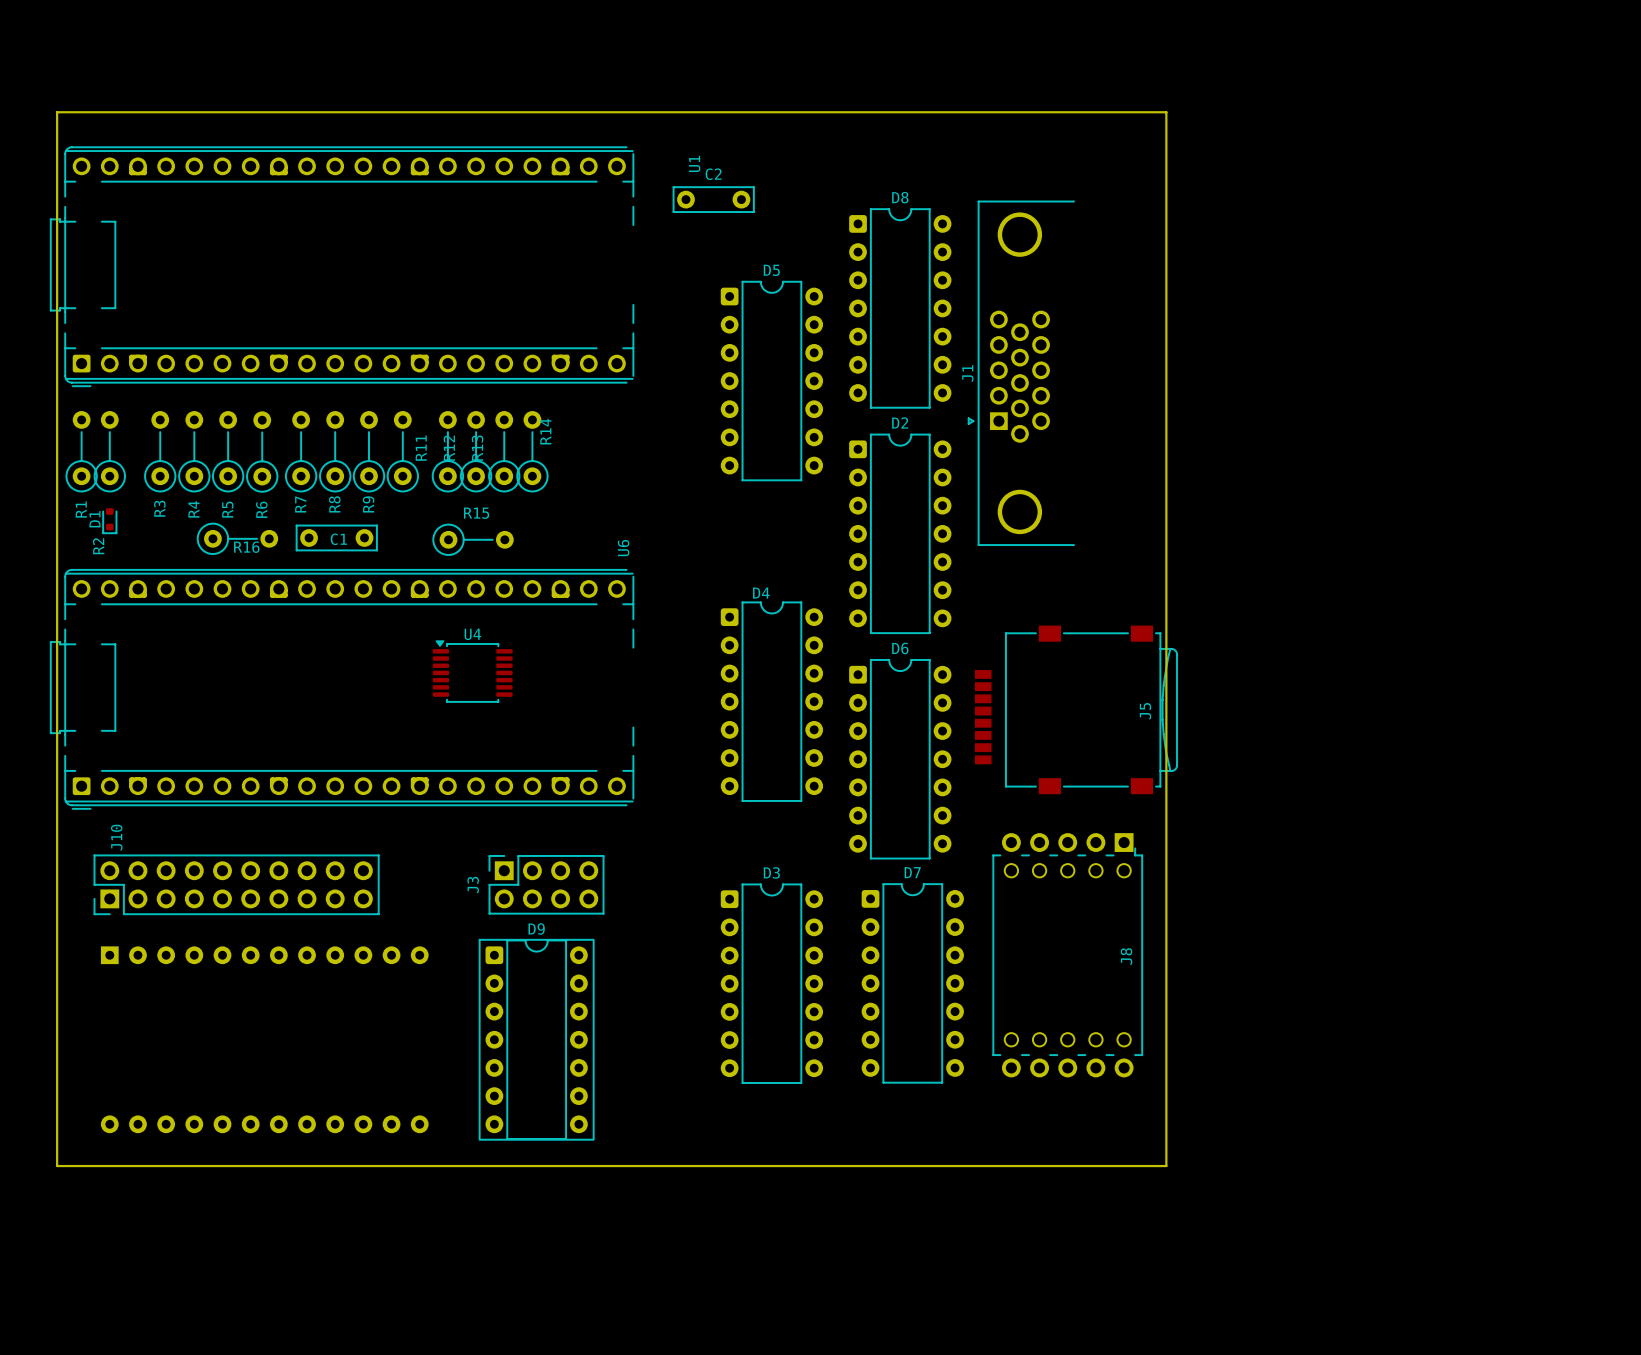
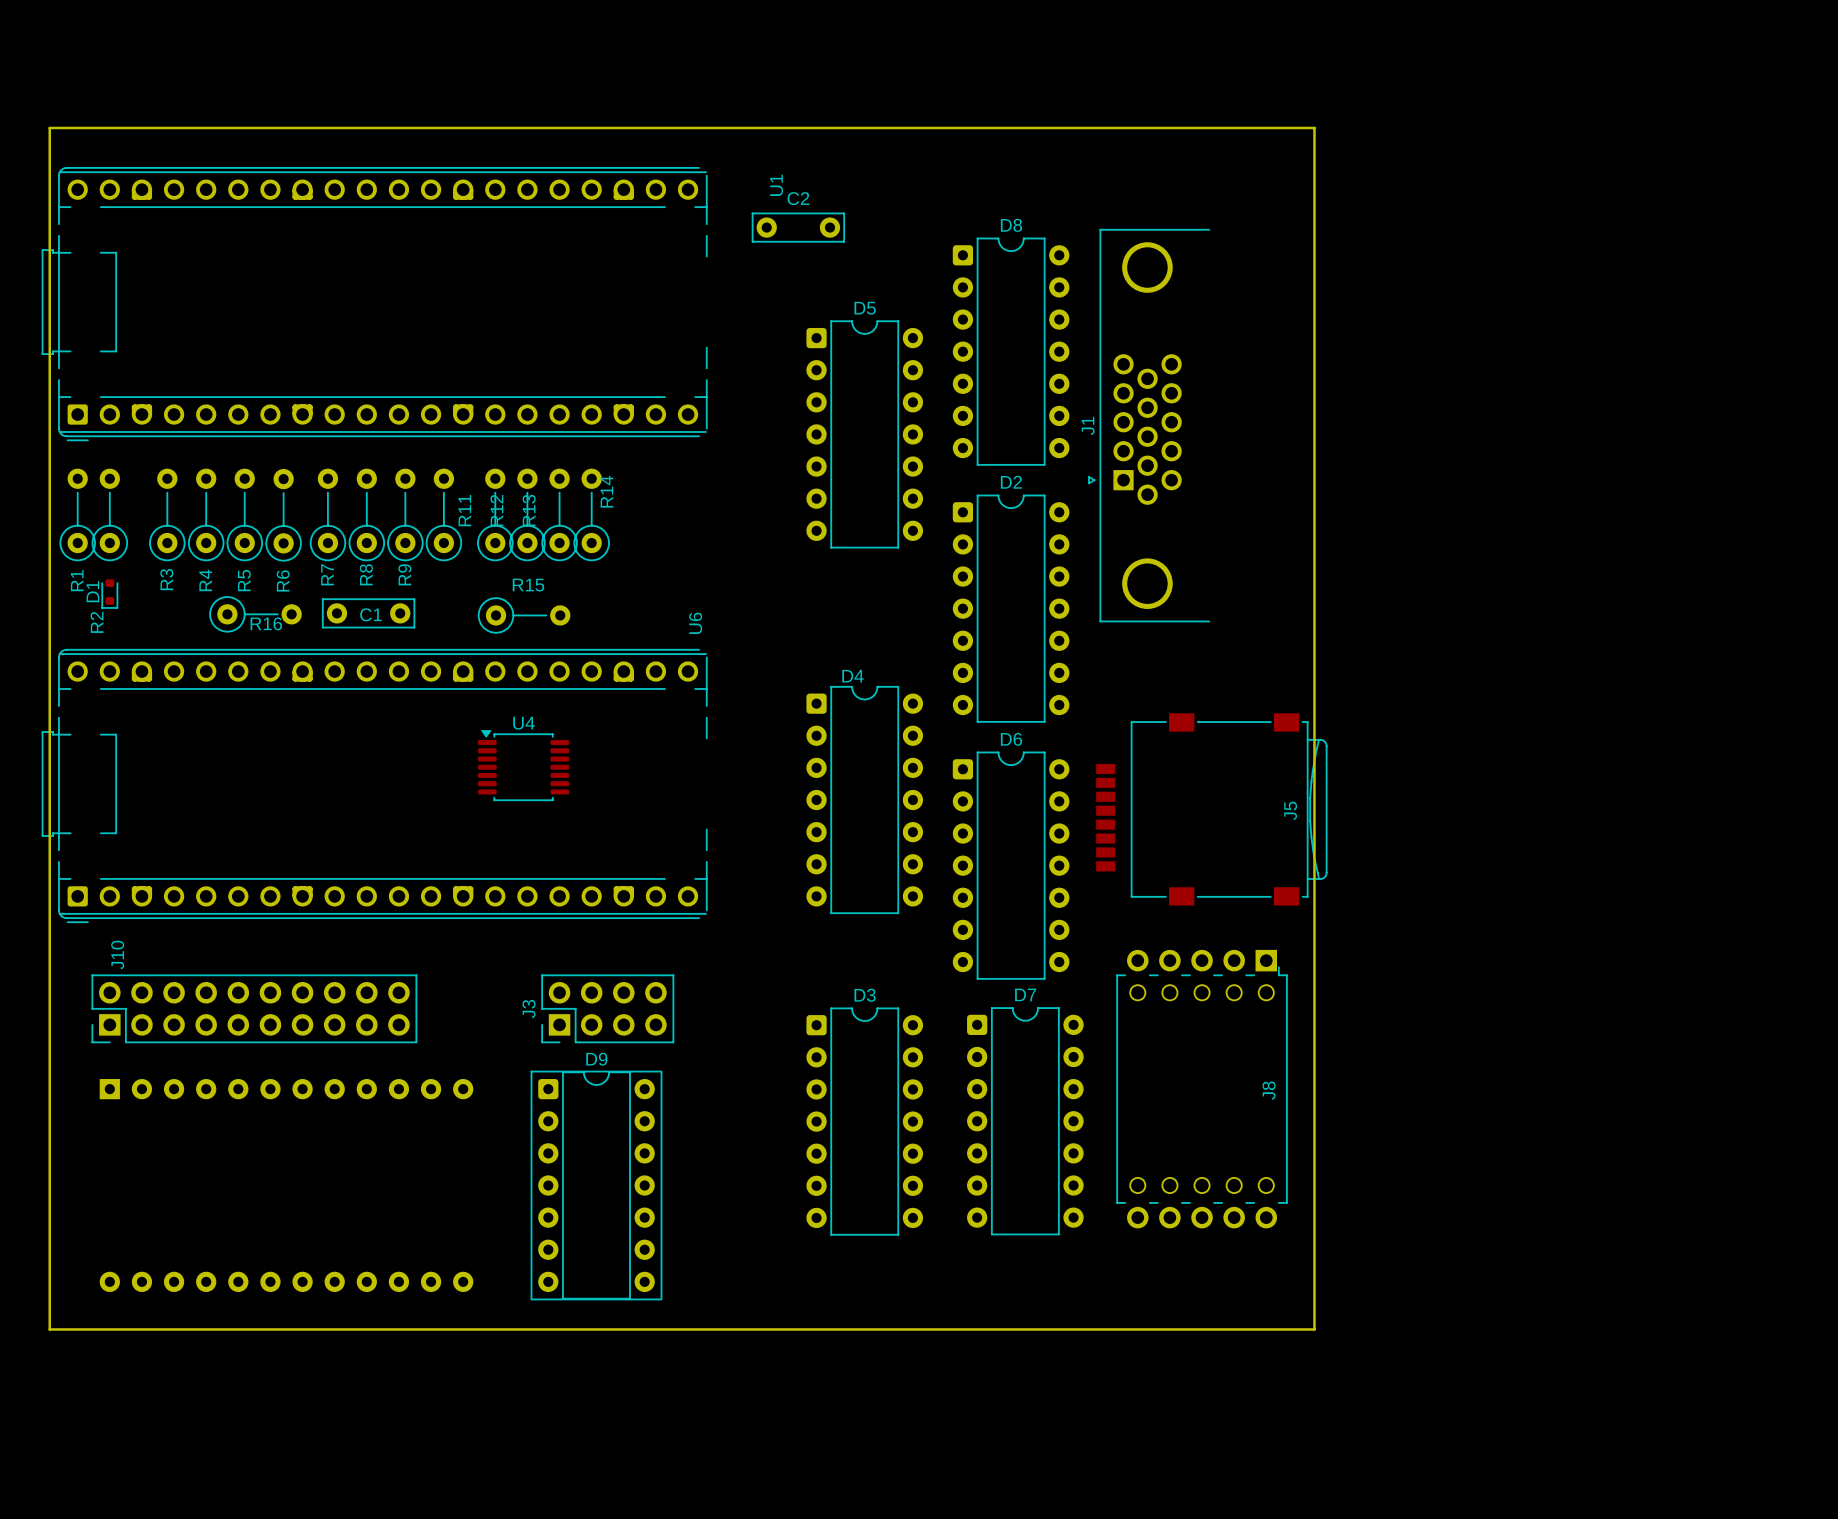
J3 footprint: [488, 855, 605, 915] -> [541, 974, 675, 1044]

